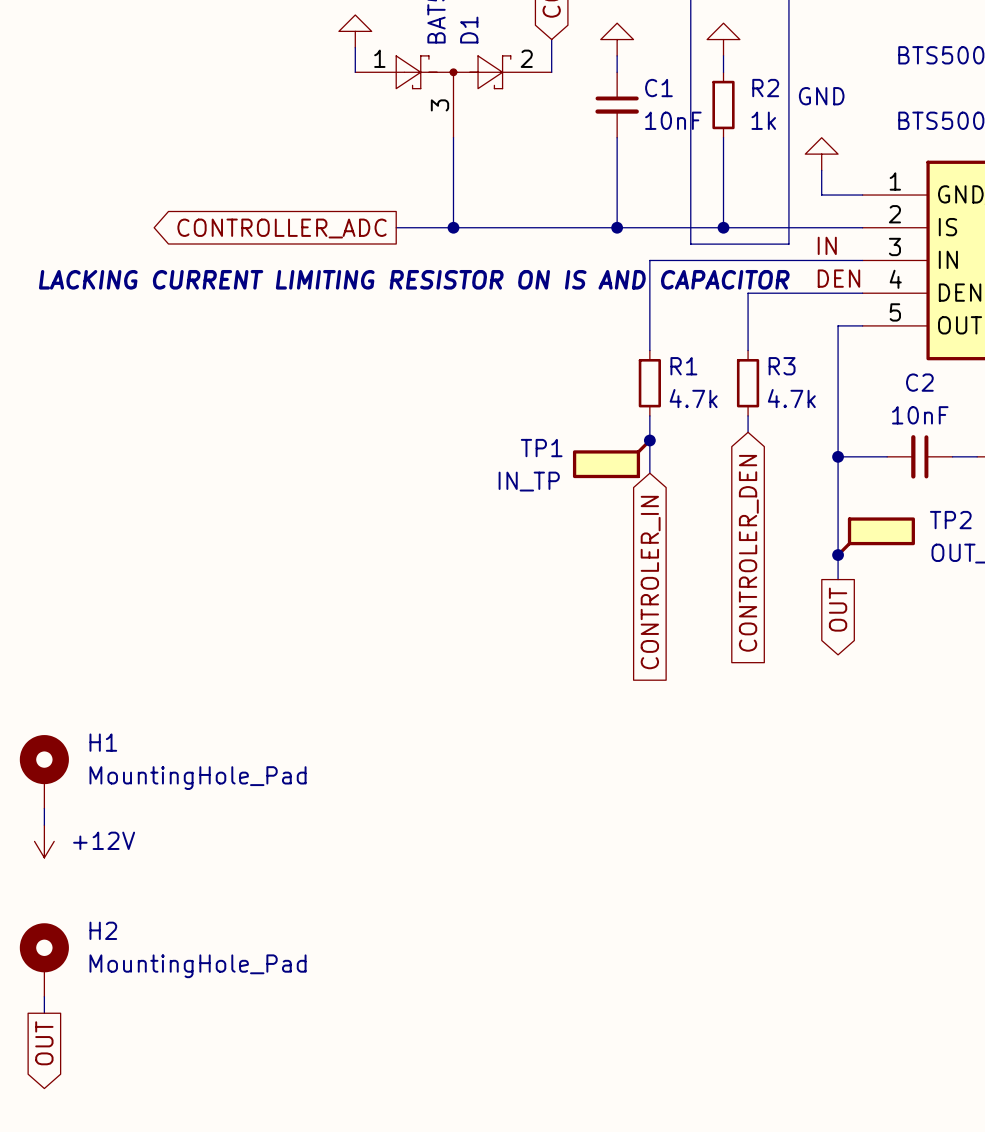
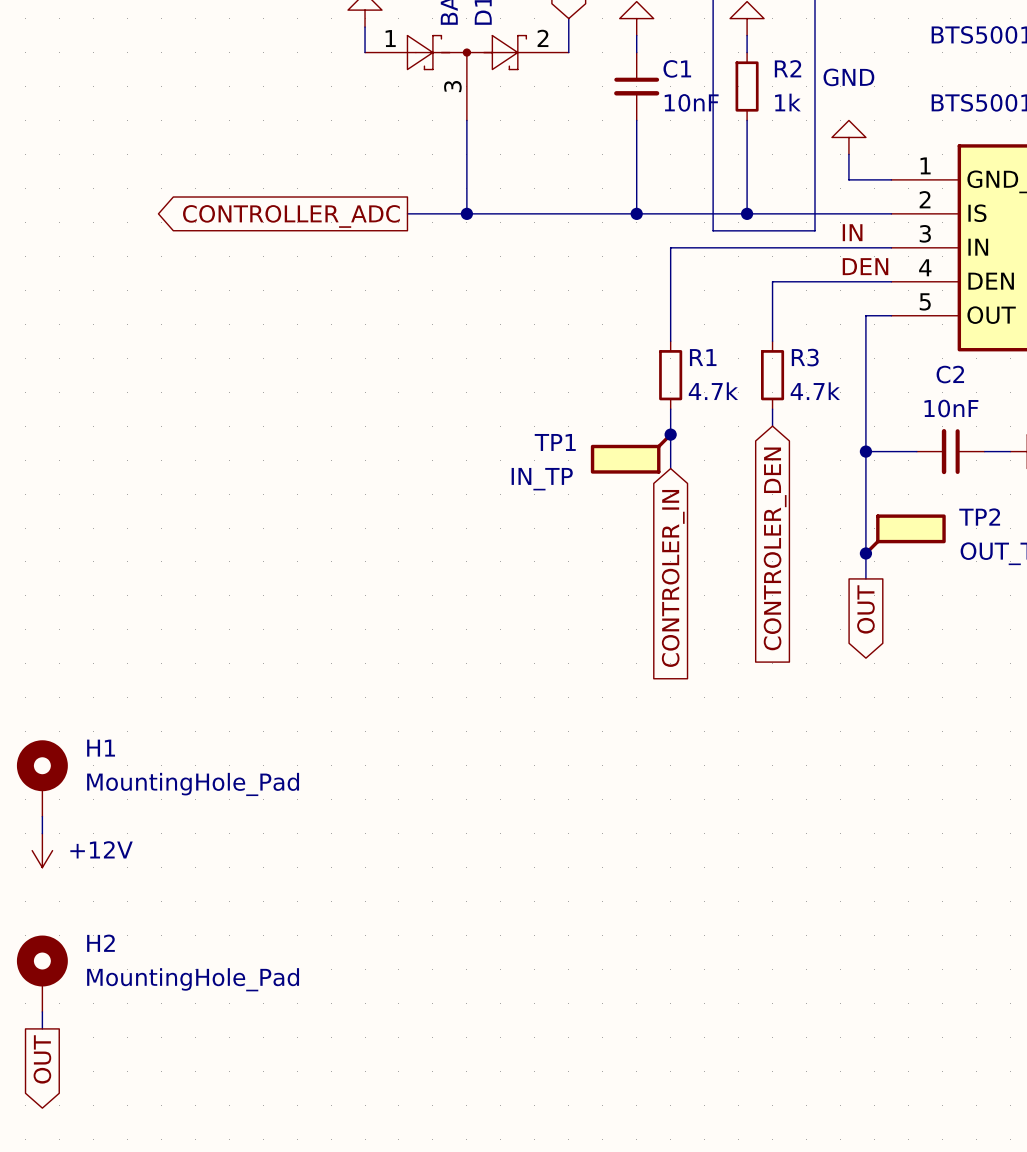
text: LACKING CURRENT LIMITING RESISTOR ON IS AND CAPACITOR (414, 279) -> none

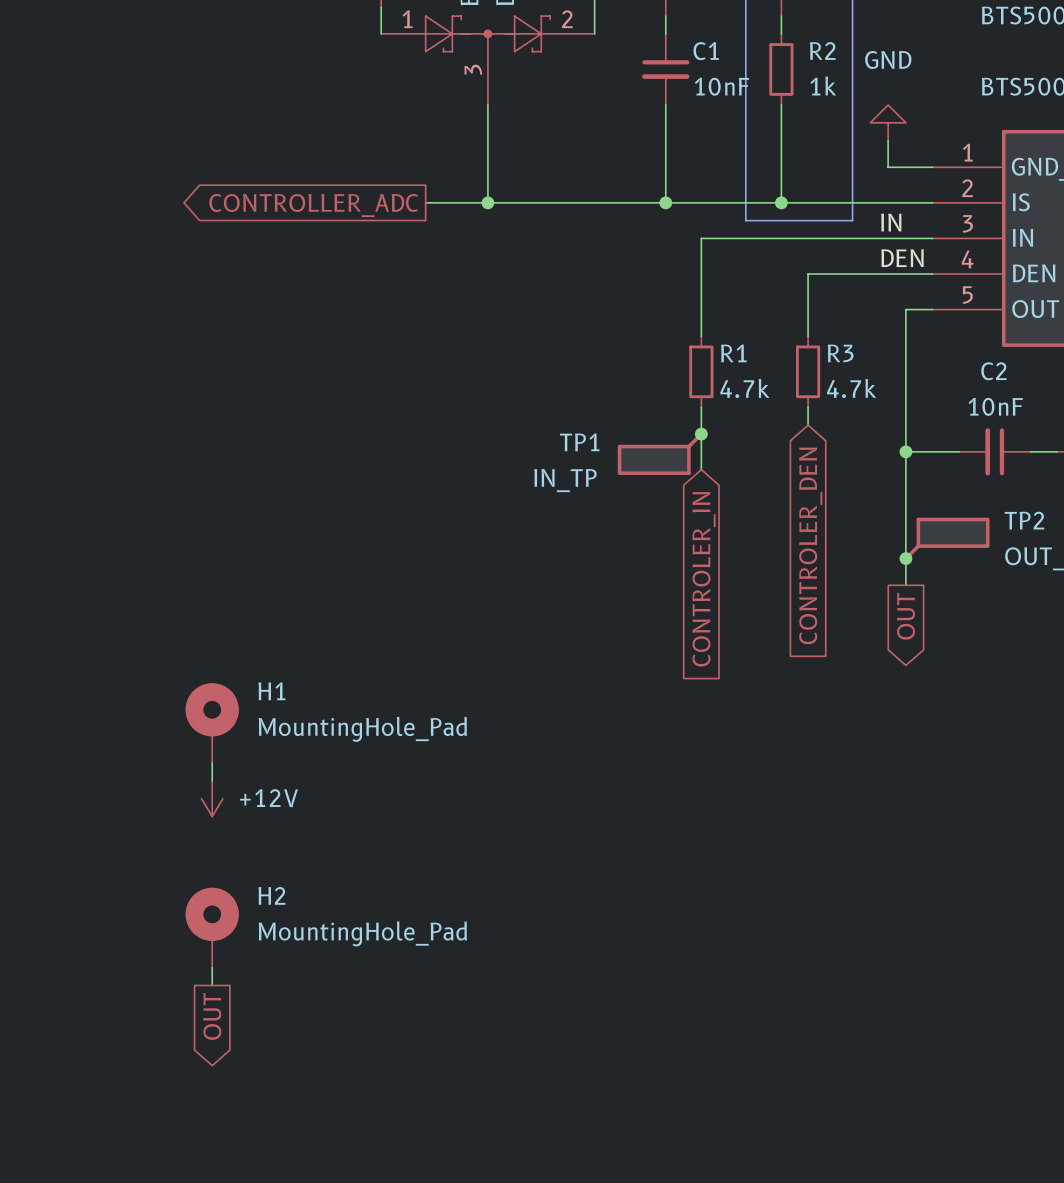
H1 position: (42, 778) -> (212, 723)
wire: (42, 816) (42, 833) -> (212, 763) (212, 780)
power symbol position: +12V (42, 850) -> +12V (212, 798)
H2 position: (42, 973) -> (212, 927)
wire: (42, 1011) (42, 1028) -> (212, 967) (212, 985)
global label position: OUT (42, 1059) -> OUT (212, 1016)

